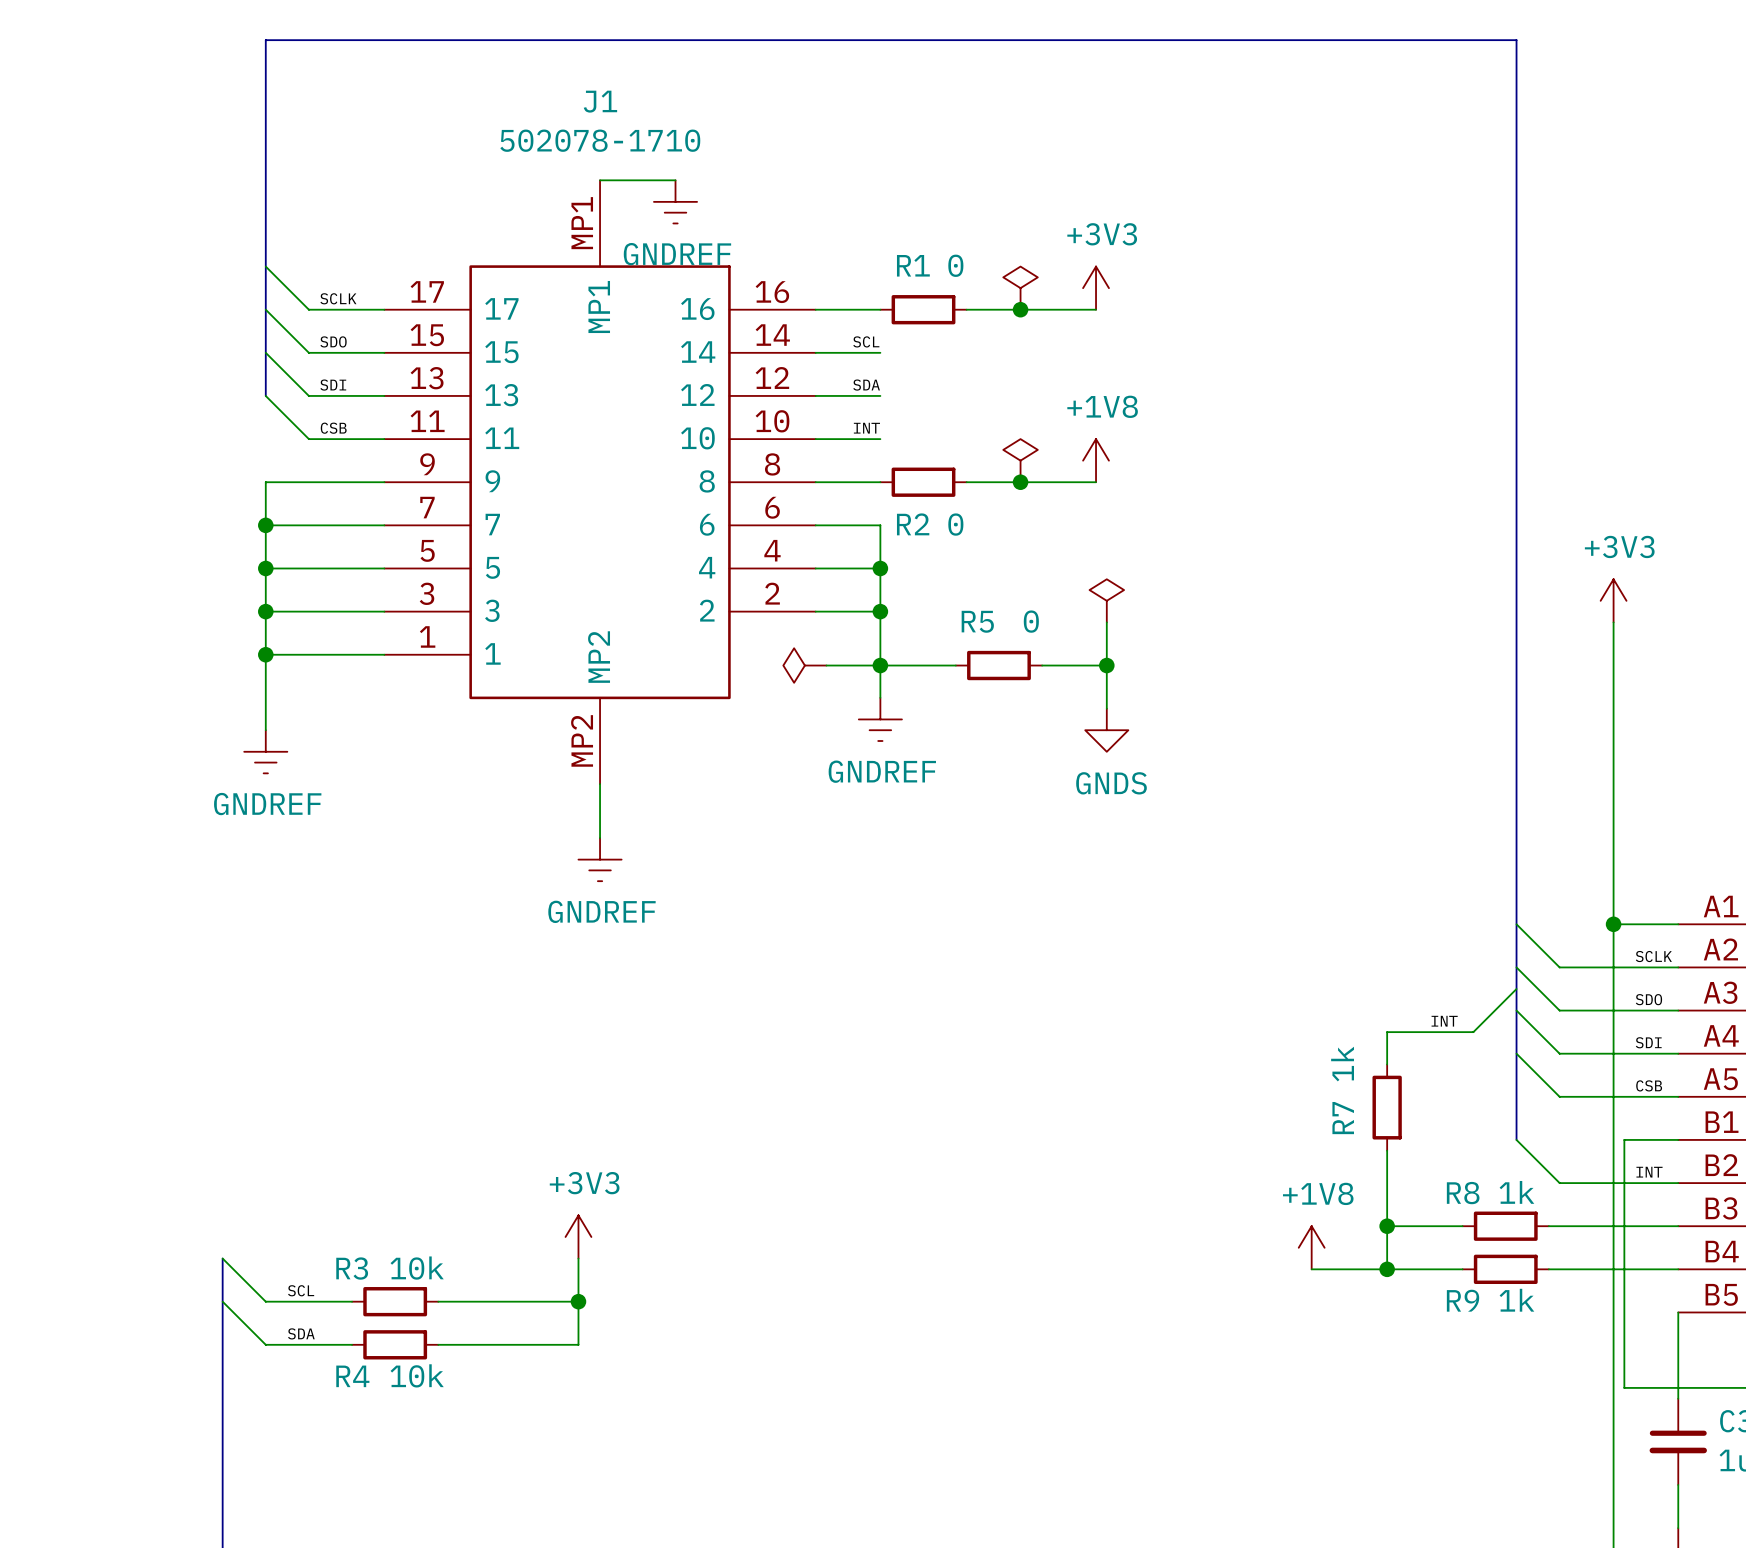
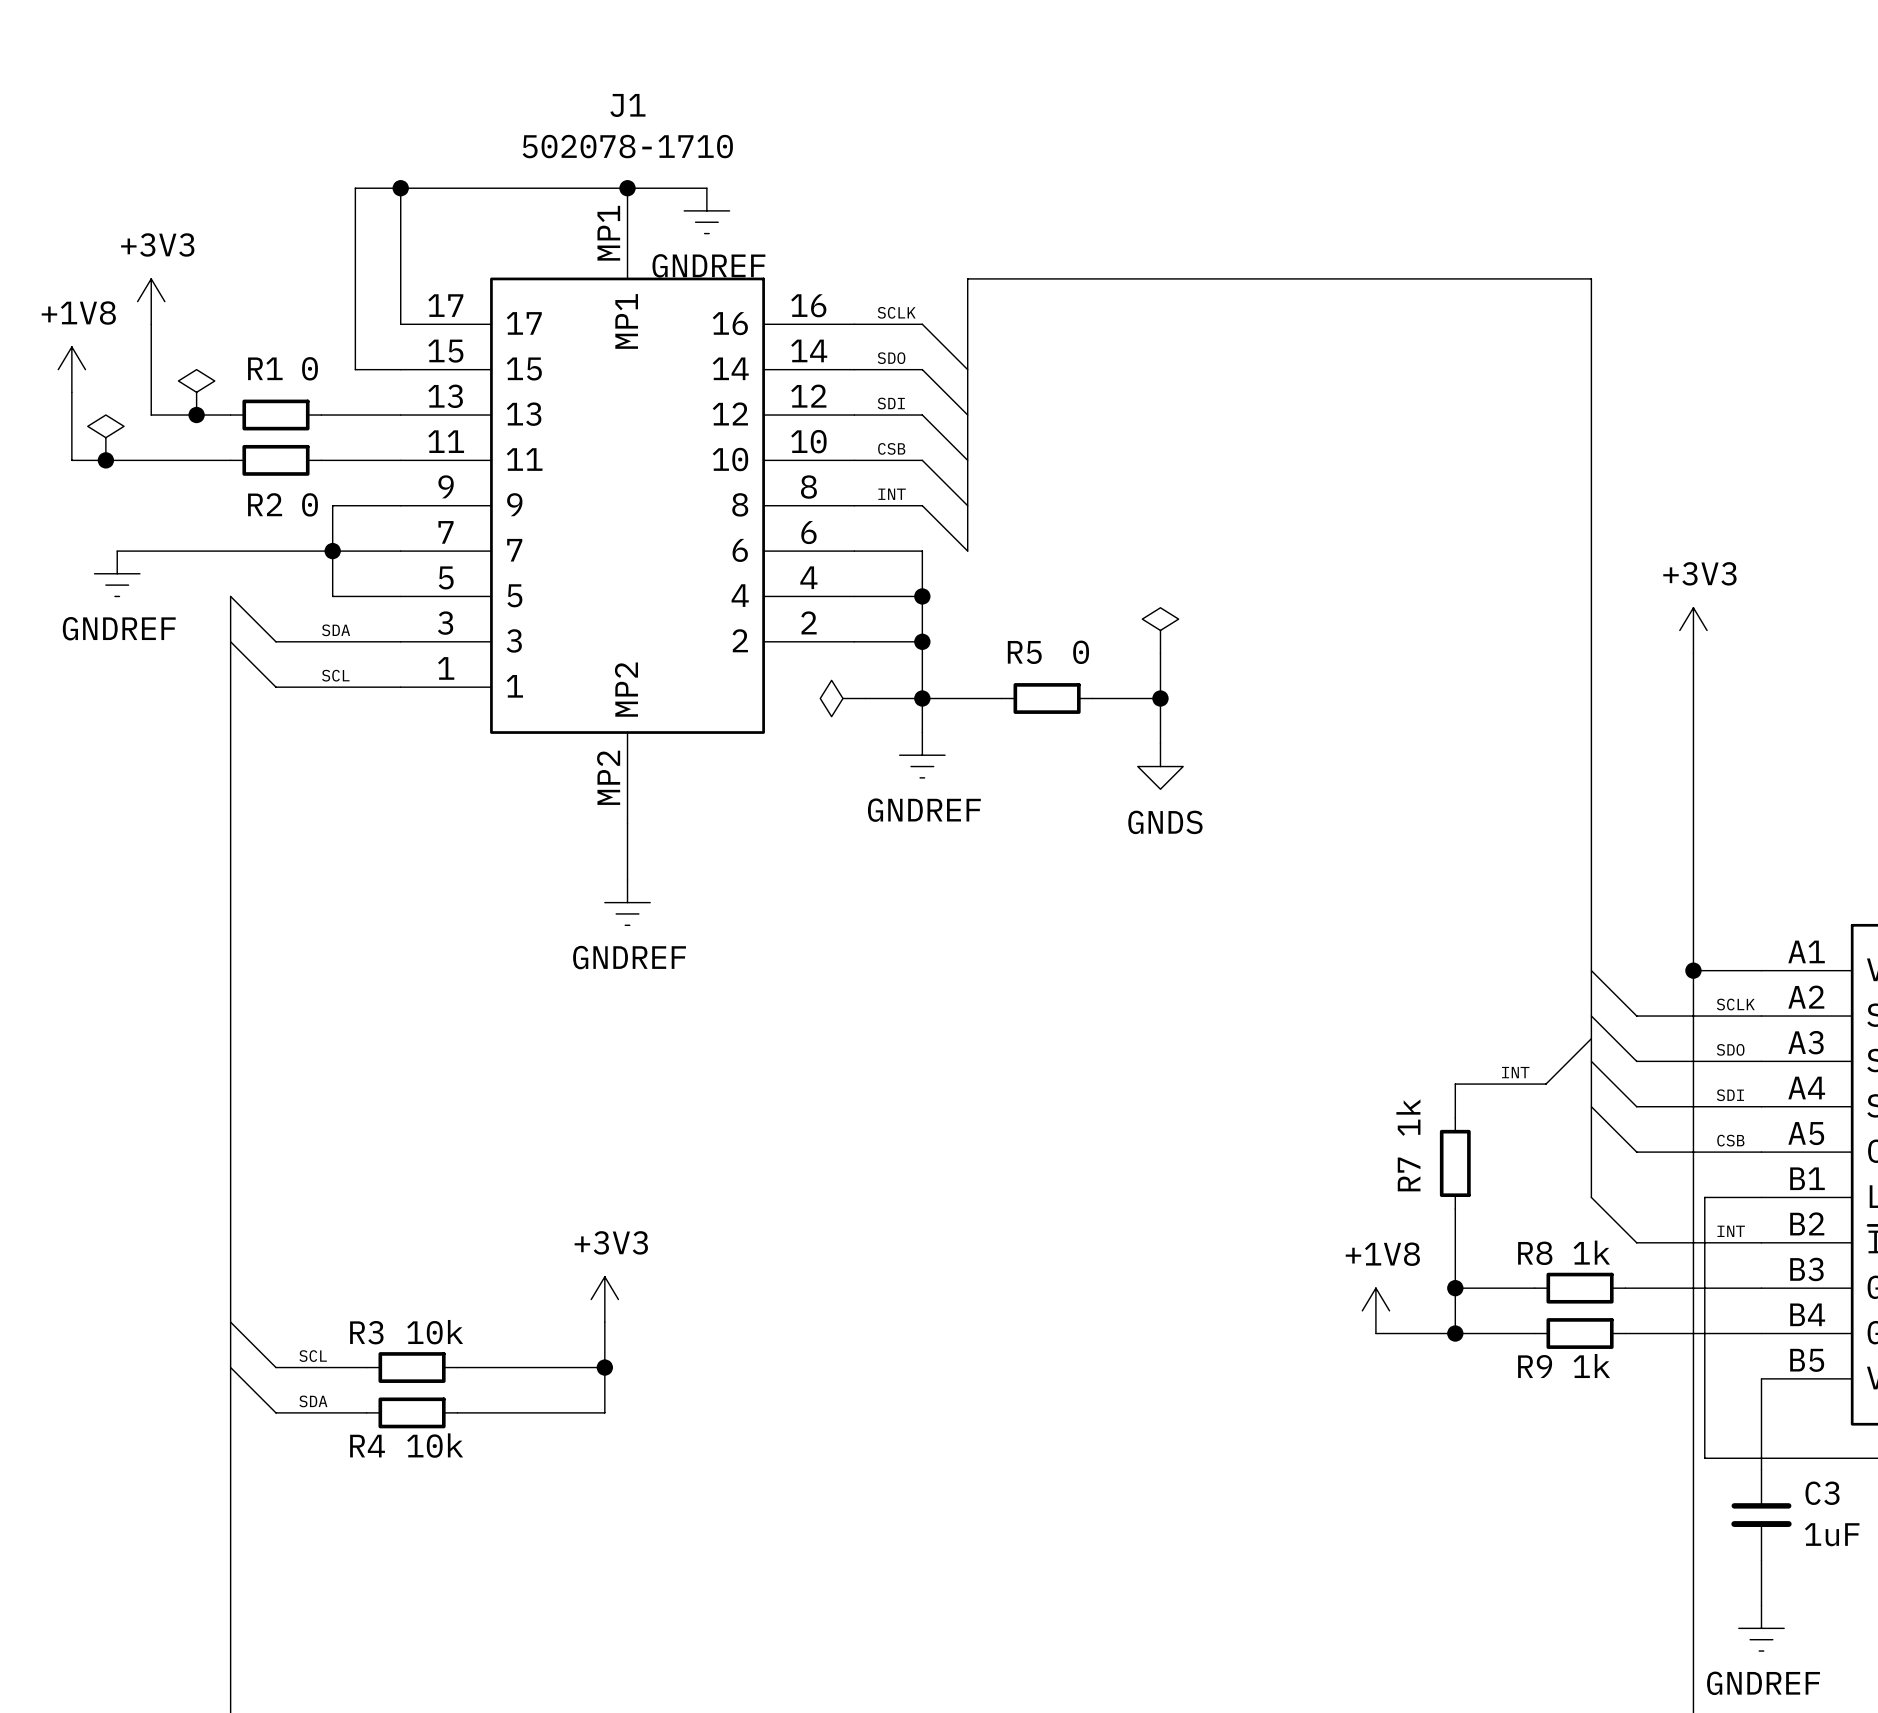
junction: none -> (400, 188)
junction: none -> (627, 188)
wire: (265, 266) (308, 309) (384, 309) -> (400, 188) (400, 324)
bus: (1516, 266) (1516, 40) (265, 40) (265, 395) -> (1591, 278) (967, 278) (967, 551)
power symbol: none -> +3V3 (151, 301)
power symbol: (1020, 288) -> none
power symbol: +3V3 (1096, 288) -> none
label: SCLK (338, 298) -> none
label: none -> SCLK (896, 312)
wire: none -> (151, 324) (151, 415) (230, 415)
wire: (265, 309) (308, 352) (341, 352) -> (627, 188) (355, 188) (355, 369)
wire: none -> (922, 324) (967, 369)
R1 position: (923, 309) -> (275, 415)
wire: (966, 309) (1096, 309) -> none
junction: (1020, 309) -> none
label: SDO (333, 341) -> none
label: none -> SDO (891, 358)
label: SCL (866, 341) -> none
power symbol: none -> +1V8 (71, 369)
wire: (265, 352) (308, 395) -> (230, 596) (275, 641)
wire: none -> (922, 369) (967, 415)
wire: none -> (71, 392) (71, 460) (230, 460)
power symbol: none -> (196, 392)
label: SDI (333, 385) -> none
label: SDA (866, 385) -> SDI (891, 403)
junction: none -> (196, 415)
wire: (265, 395) (308, 439) -> (230, 641) (275, 687)
wire: none -> (922, 415) (967, 460)
power symbol: none -> (105, 437)
label: CSB (333, 428) -> none
label: none -> CSB (891, 448)
label position: INT (866, 428) -> INT (892, 494)
junction: none -> (105, 460)
wire: none -> (922, 460) (967, 505)
power symbol: (1020, 460) -> none
power symbol: +1V8 (1096, 460) -> none
wire: (319, 482) (265, 482) (265, 730) -> none
wire: none -> (922, 505) (967, 551)
R2 position: (923, 482) -> (275, 460)
wire: (966, 482) (1096, 482) -> none
junction: (1020, 482) -> none
wire: none -> (117, 551) (275, 551)
junction: (265, 525) -> none
junction: none -> (332, 551)
bus: none -> (230, 596) (230, 1322)
wire: (265, 568) (319, 568) -> (332, 505) (332, 596)
junction: (265, 568) -> none
label: none -> SDA (336, 630)
junction: (265, 611) -> none
label: none -> SCL (335, 675)
junction: (265, 654) -> none
power symbol position: GNDREF (265, 751) -> GNDREF (117, 573)

